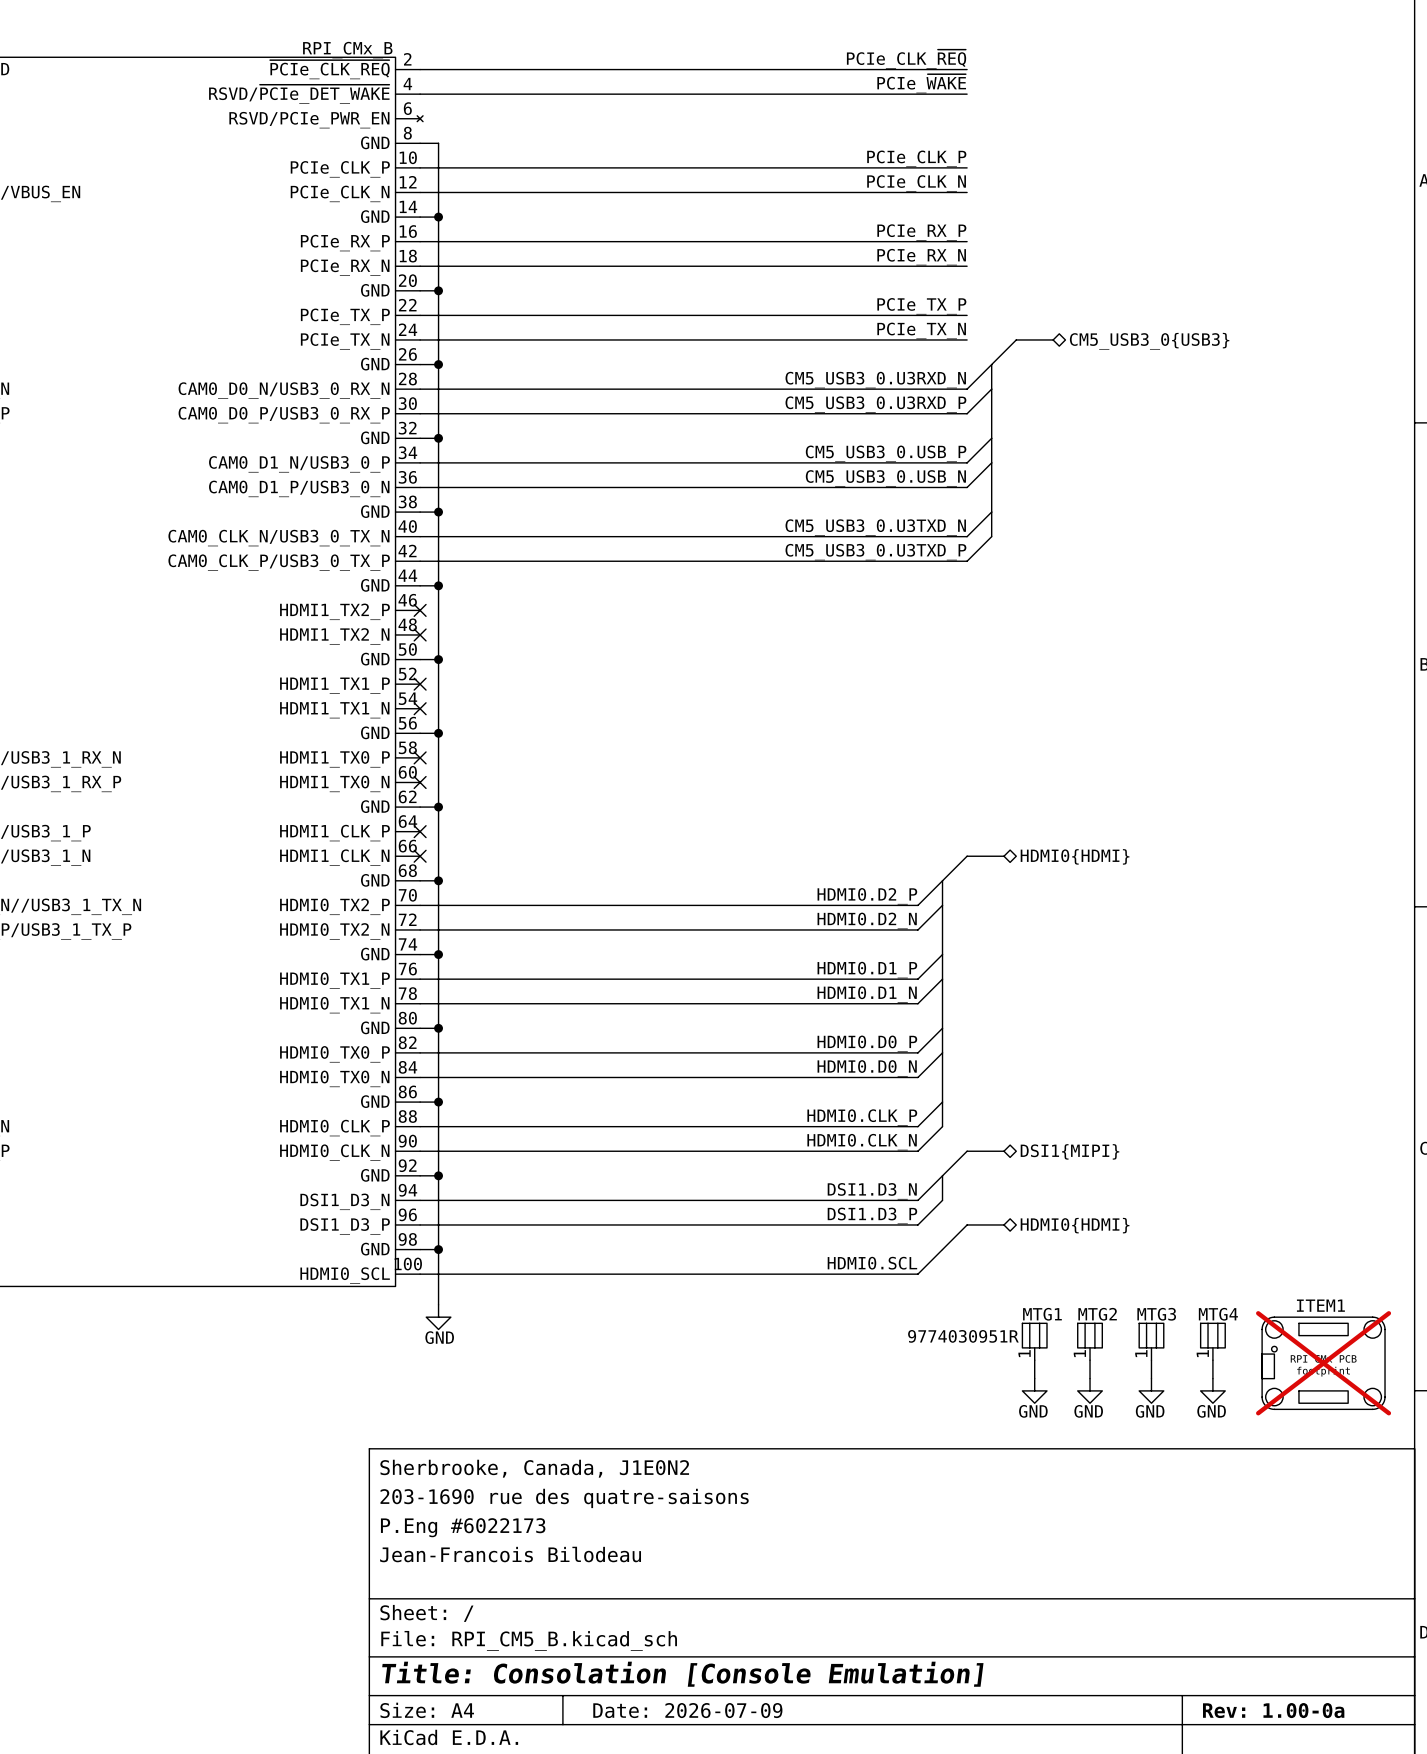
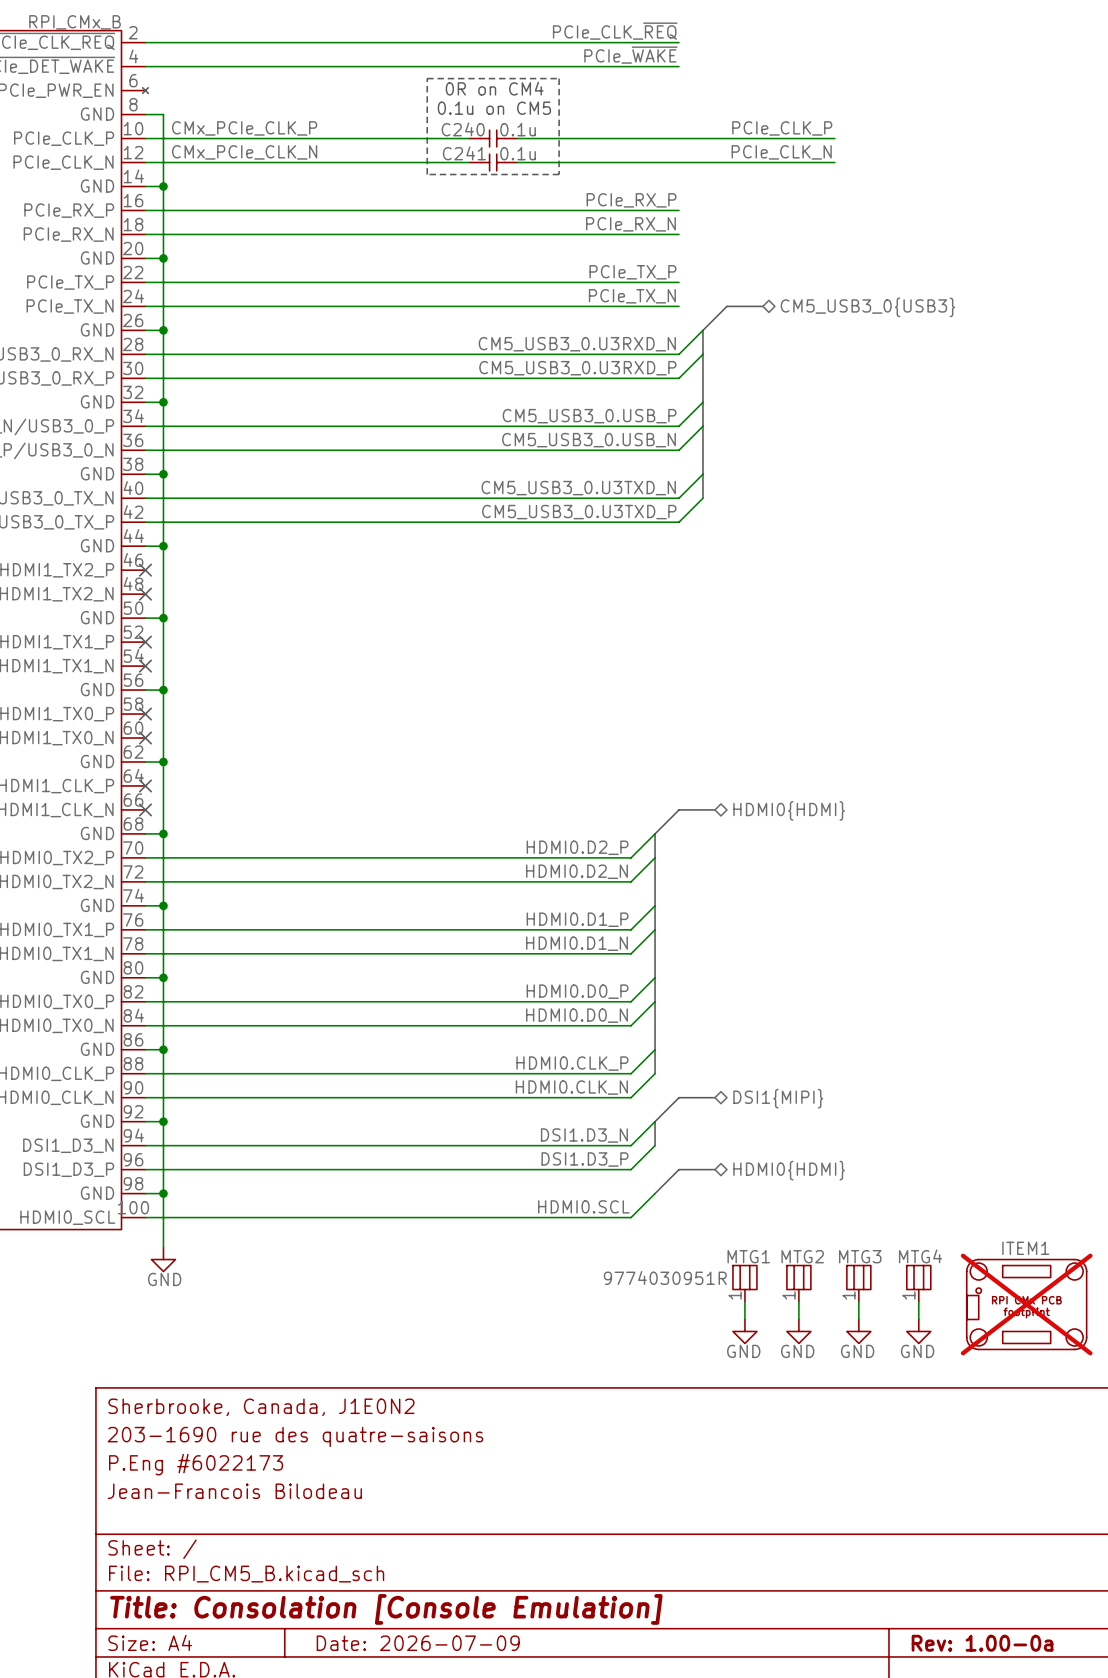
line: none -> (427, 78) (559, 78) (559, 174) (427, 174) (427, 78)
text: none -> 0R on CM4 (494, 88)
text: none -> 0.1u on CM5 (494, 108)
label: none -> CMx_PCIe_CLK_P (244, 128)
label position: PCIe_CLK_P (916, 158) -> PCIe_CLK_P (782, 128)
C240: none -> 0.1u (493, 138)
wire: none -> (679, 138) (834, 138)
label: none -> CMx_PCIe_CLK_N (244, 152)
label position: PCIe_CLK_N (916, 183) -> PCIe_CLK_N (781, 152)
C241: none -> 0.1u (493, 162)
wire: none -> (679, 162) (834, 162)

